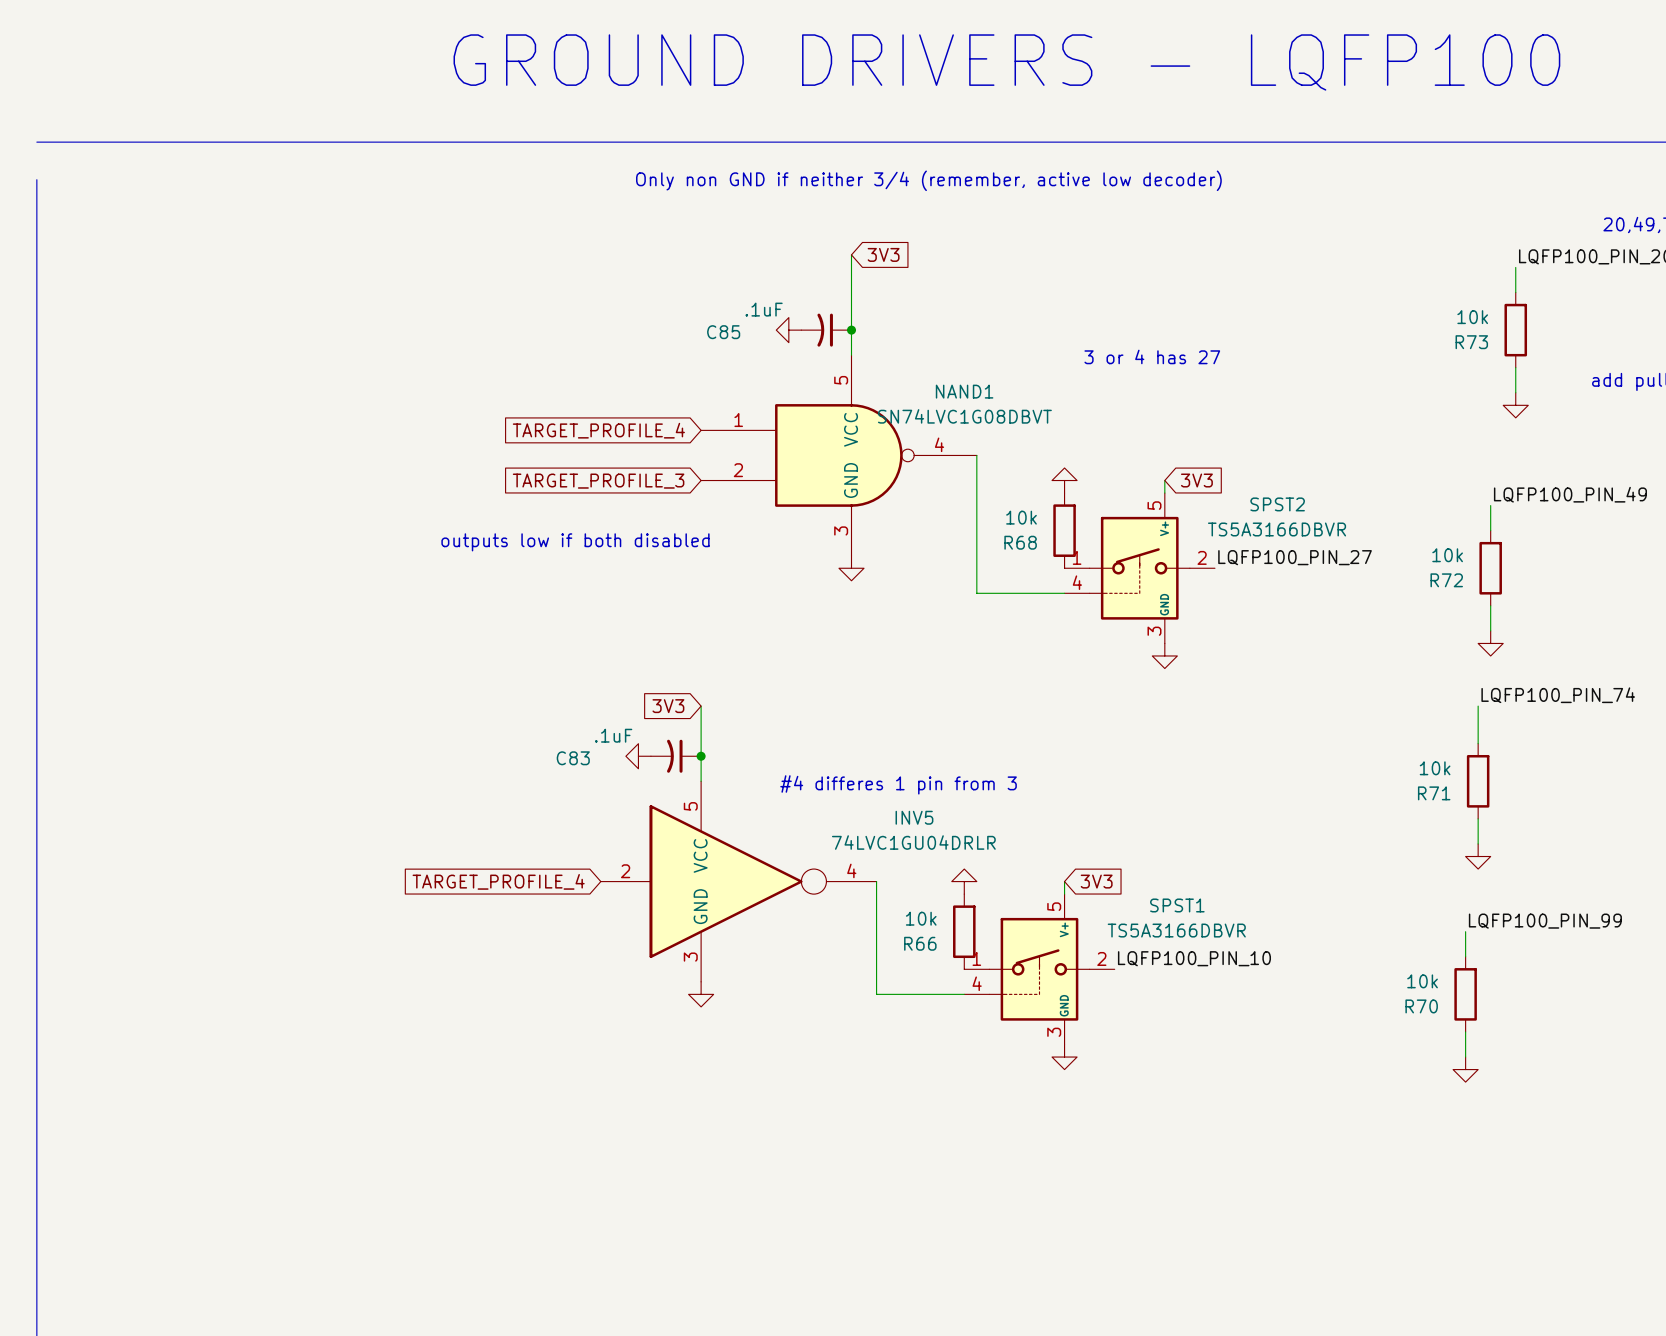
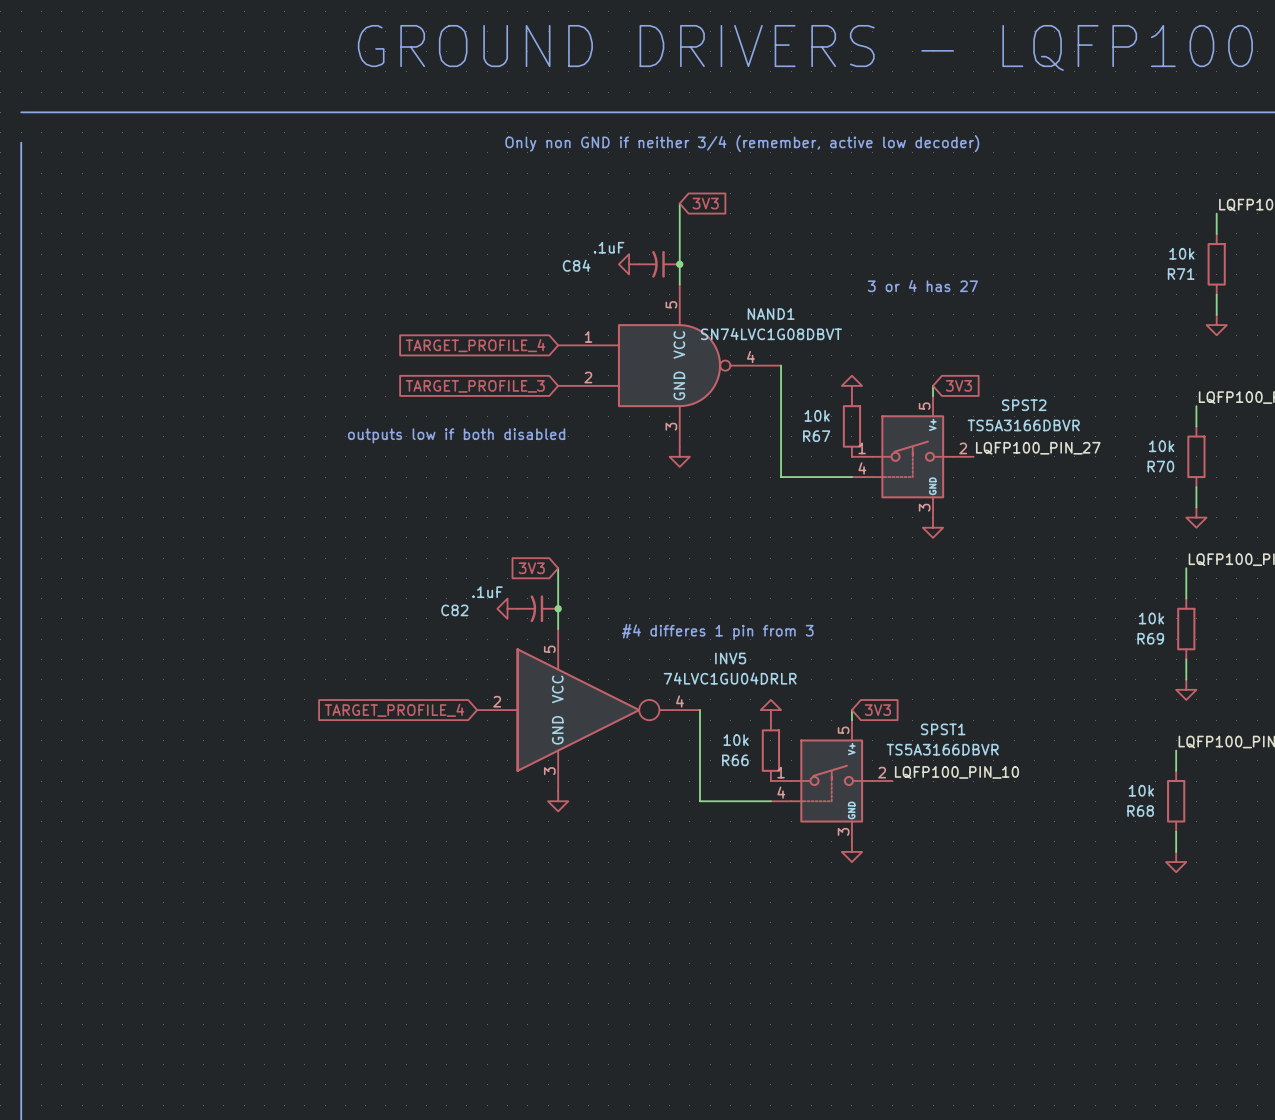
C85 name: C85 (723, 332) -> C84 (576, 265)
R73 name: R73 (1471, 342) -> R71 (1181, 274)
R68 name: R68 (1020, 542) -> R67 (816, 436)
R72 name: R72 (1446, 580) -> R70 (1160, 466)
C83 name: C83 (573, 758) -> C82 (454, 610)
R71 name: R71 (1434, 793) -> R69 (1150, 638)
R70 name: R70 (1421, 1006) -> R68 (1140, 811)

